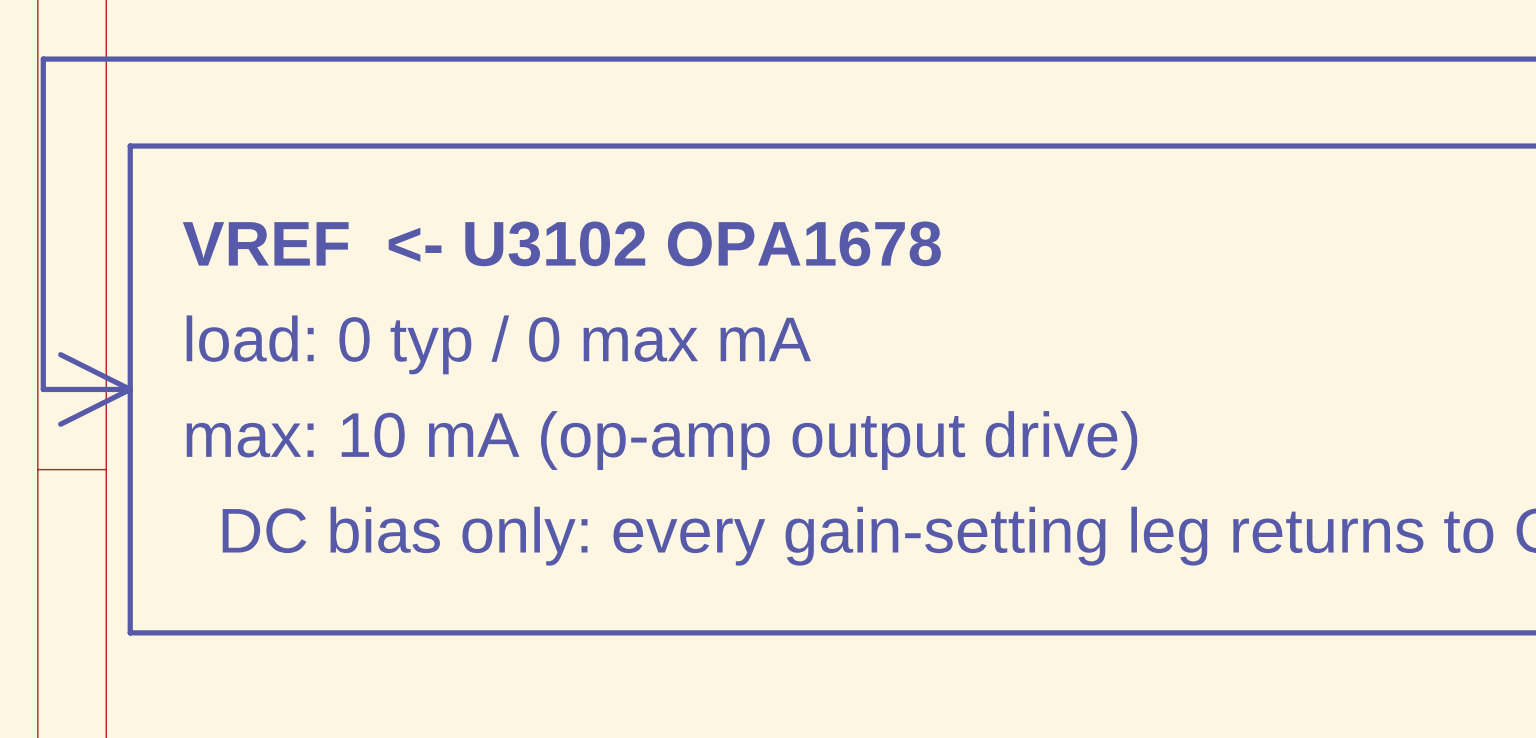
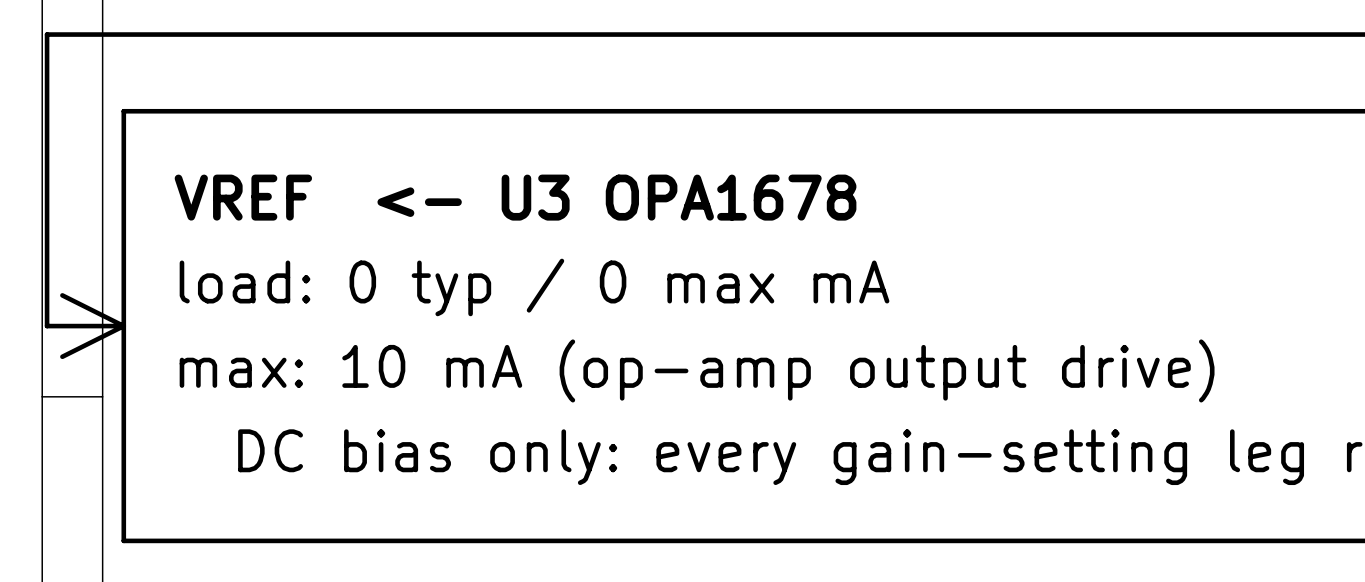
text: VREF <- U3102 OPA1678 (561, 243) -> VREF <- U3 OPA1678 (515, 197)

